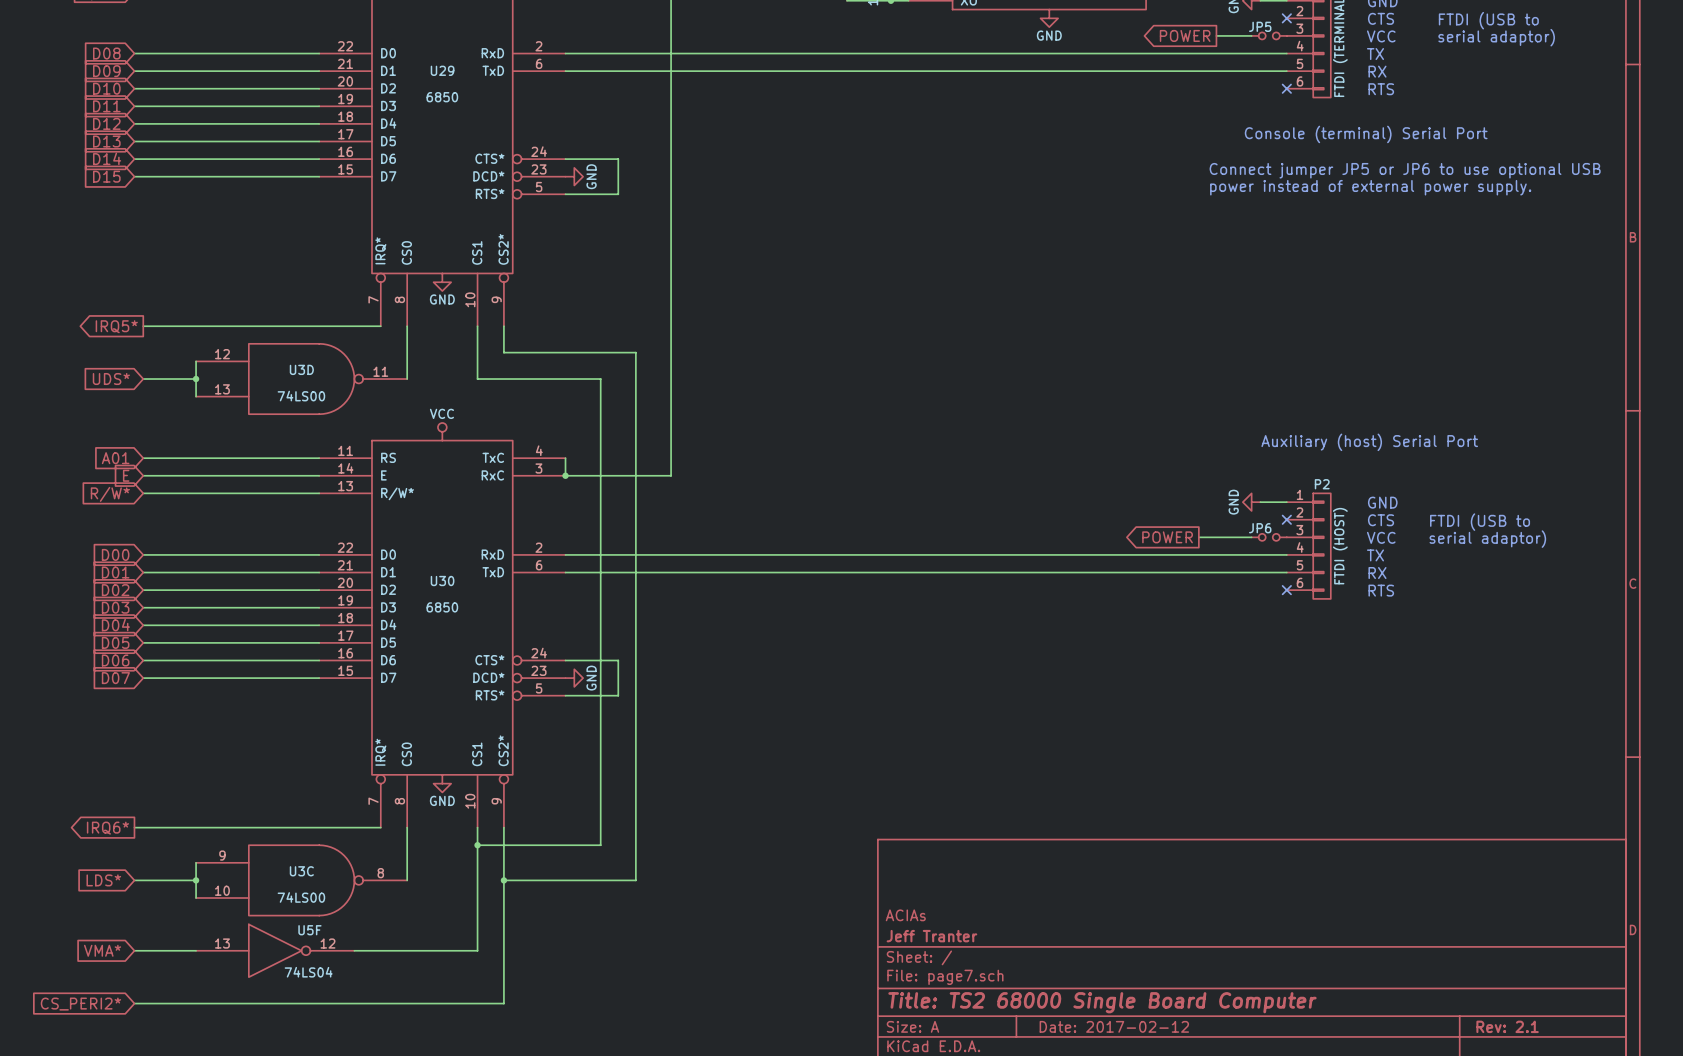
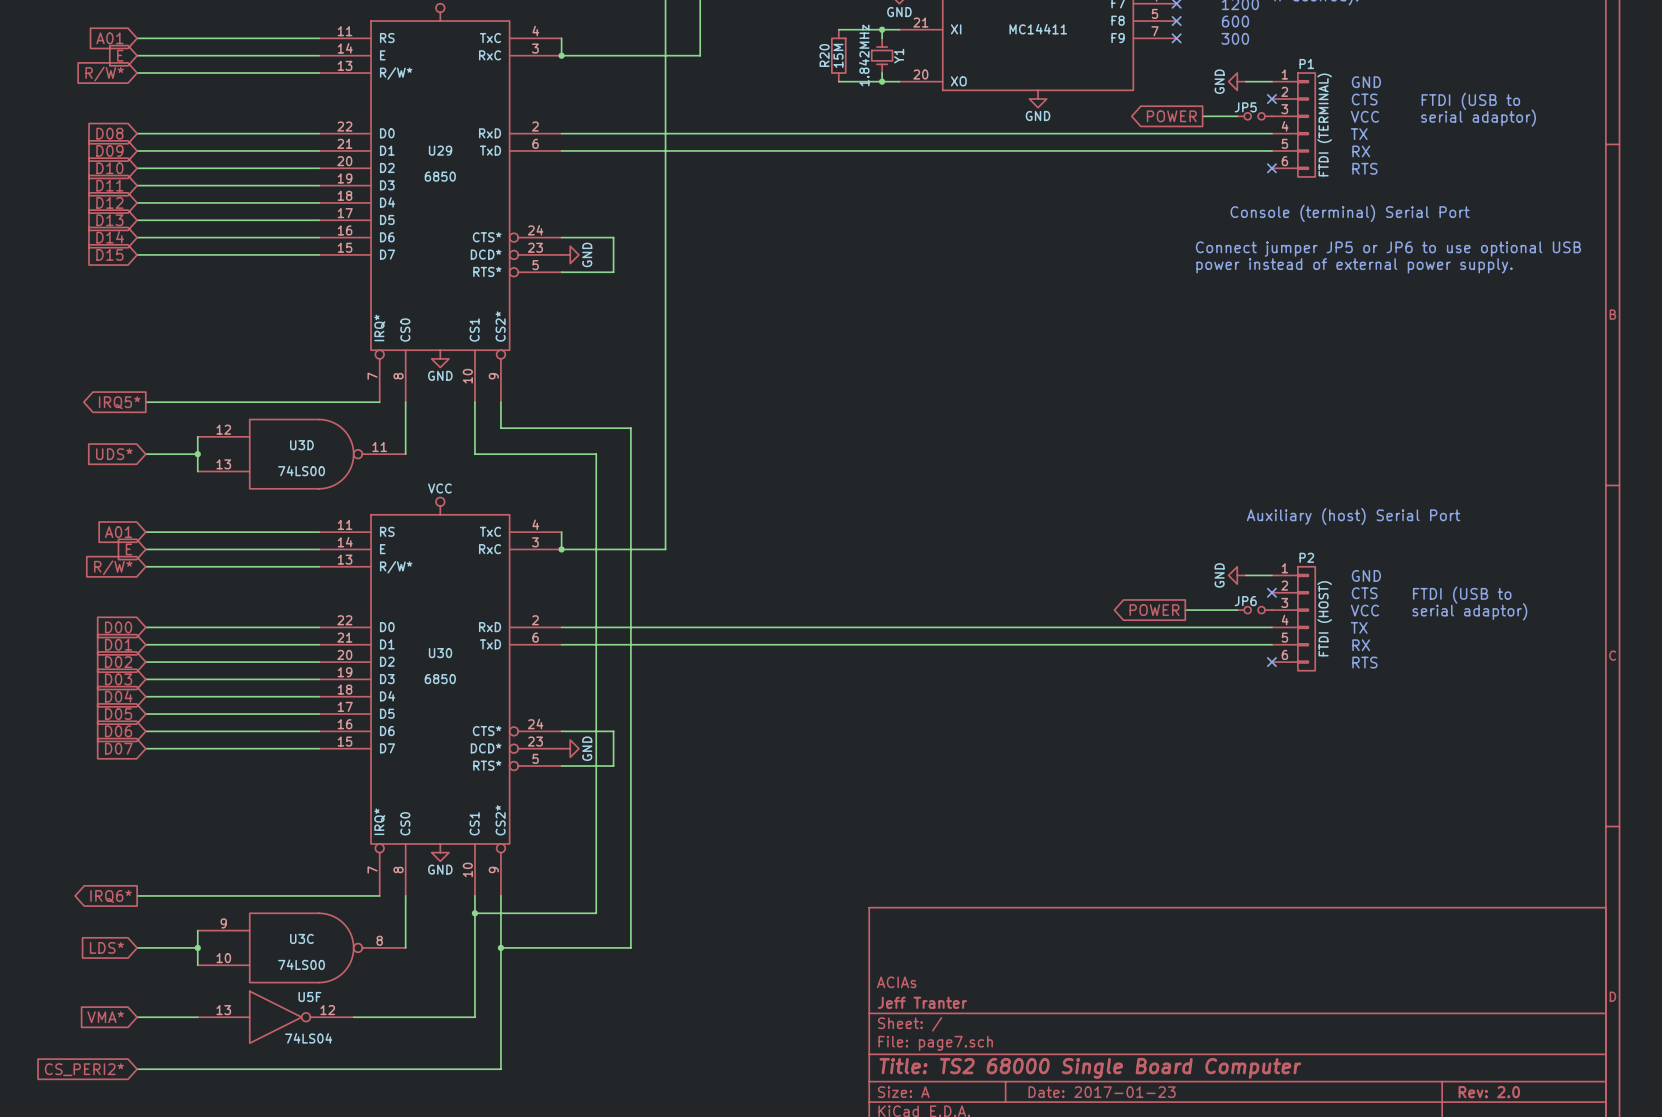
title block: Date: 2017-02-12 (1114, 1026) -> Date: 2017-01-23 (1102, 1092)
title block: Rev: 2.1 (1507, 1026) -> Rev: 2.0 (1489, 1092)

